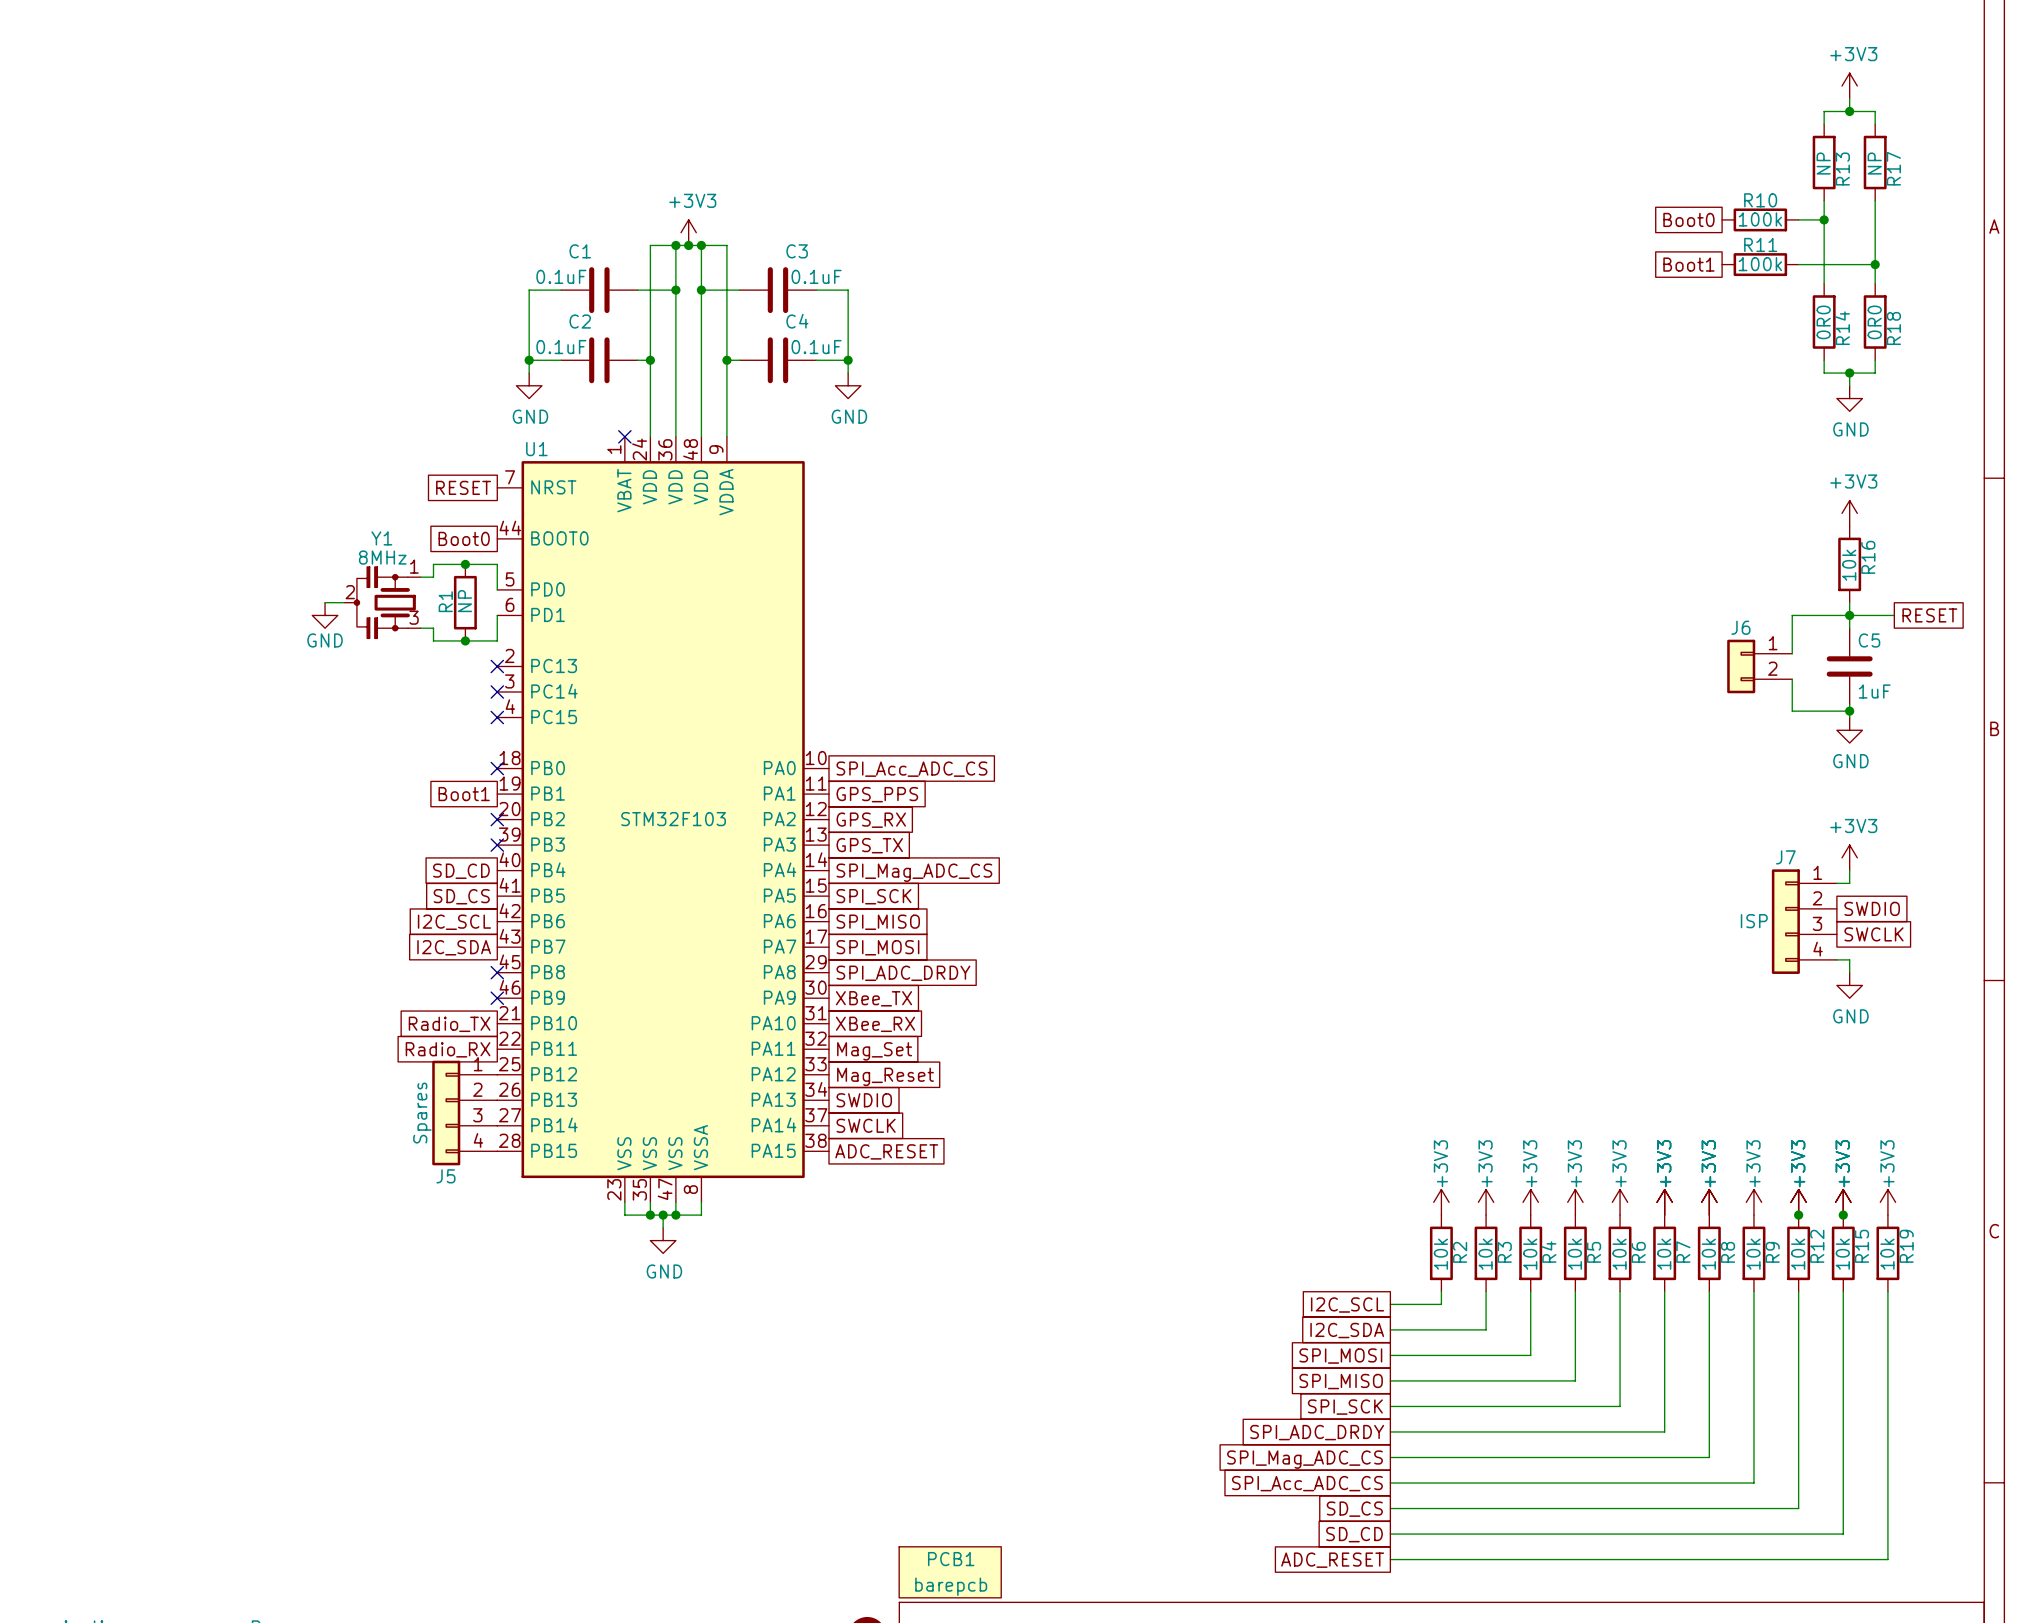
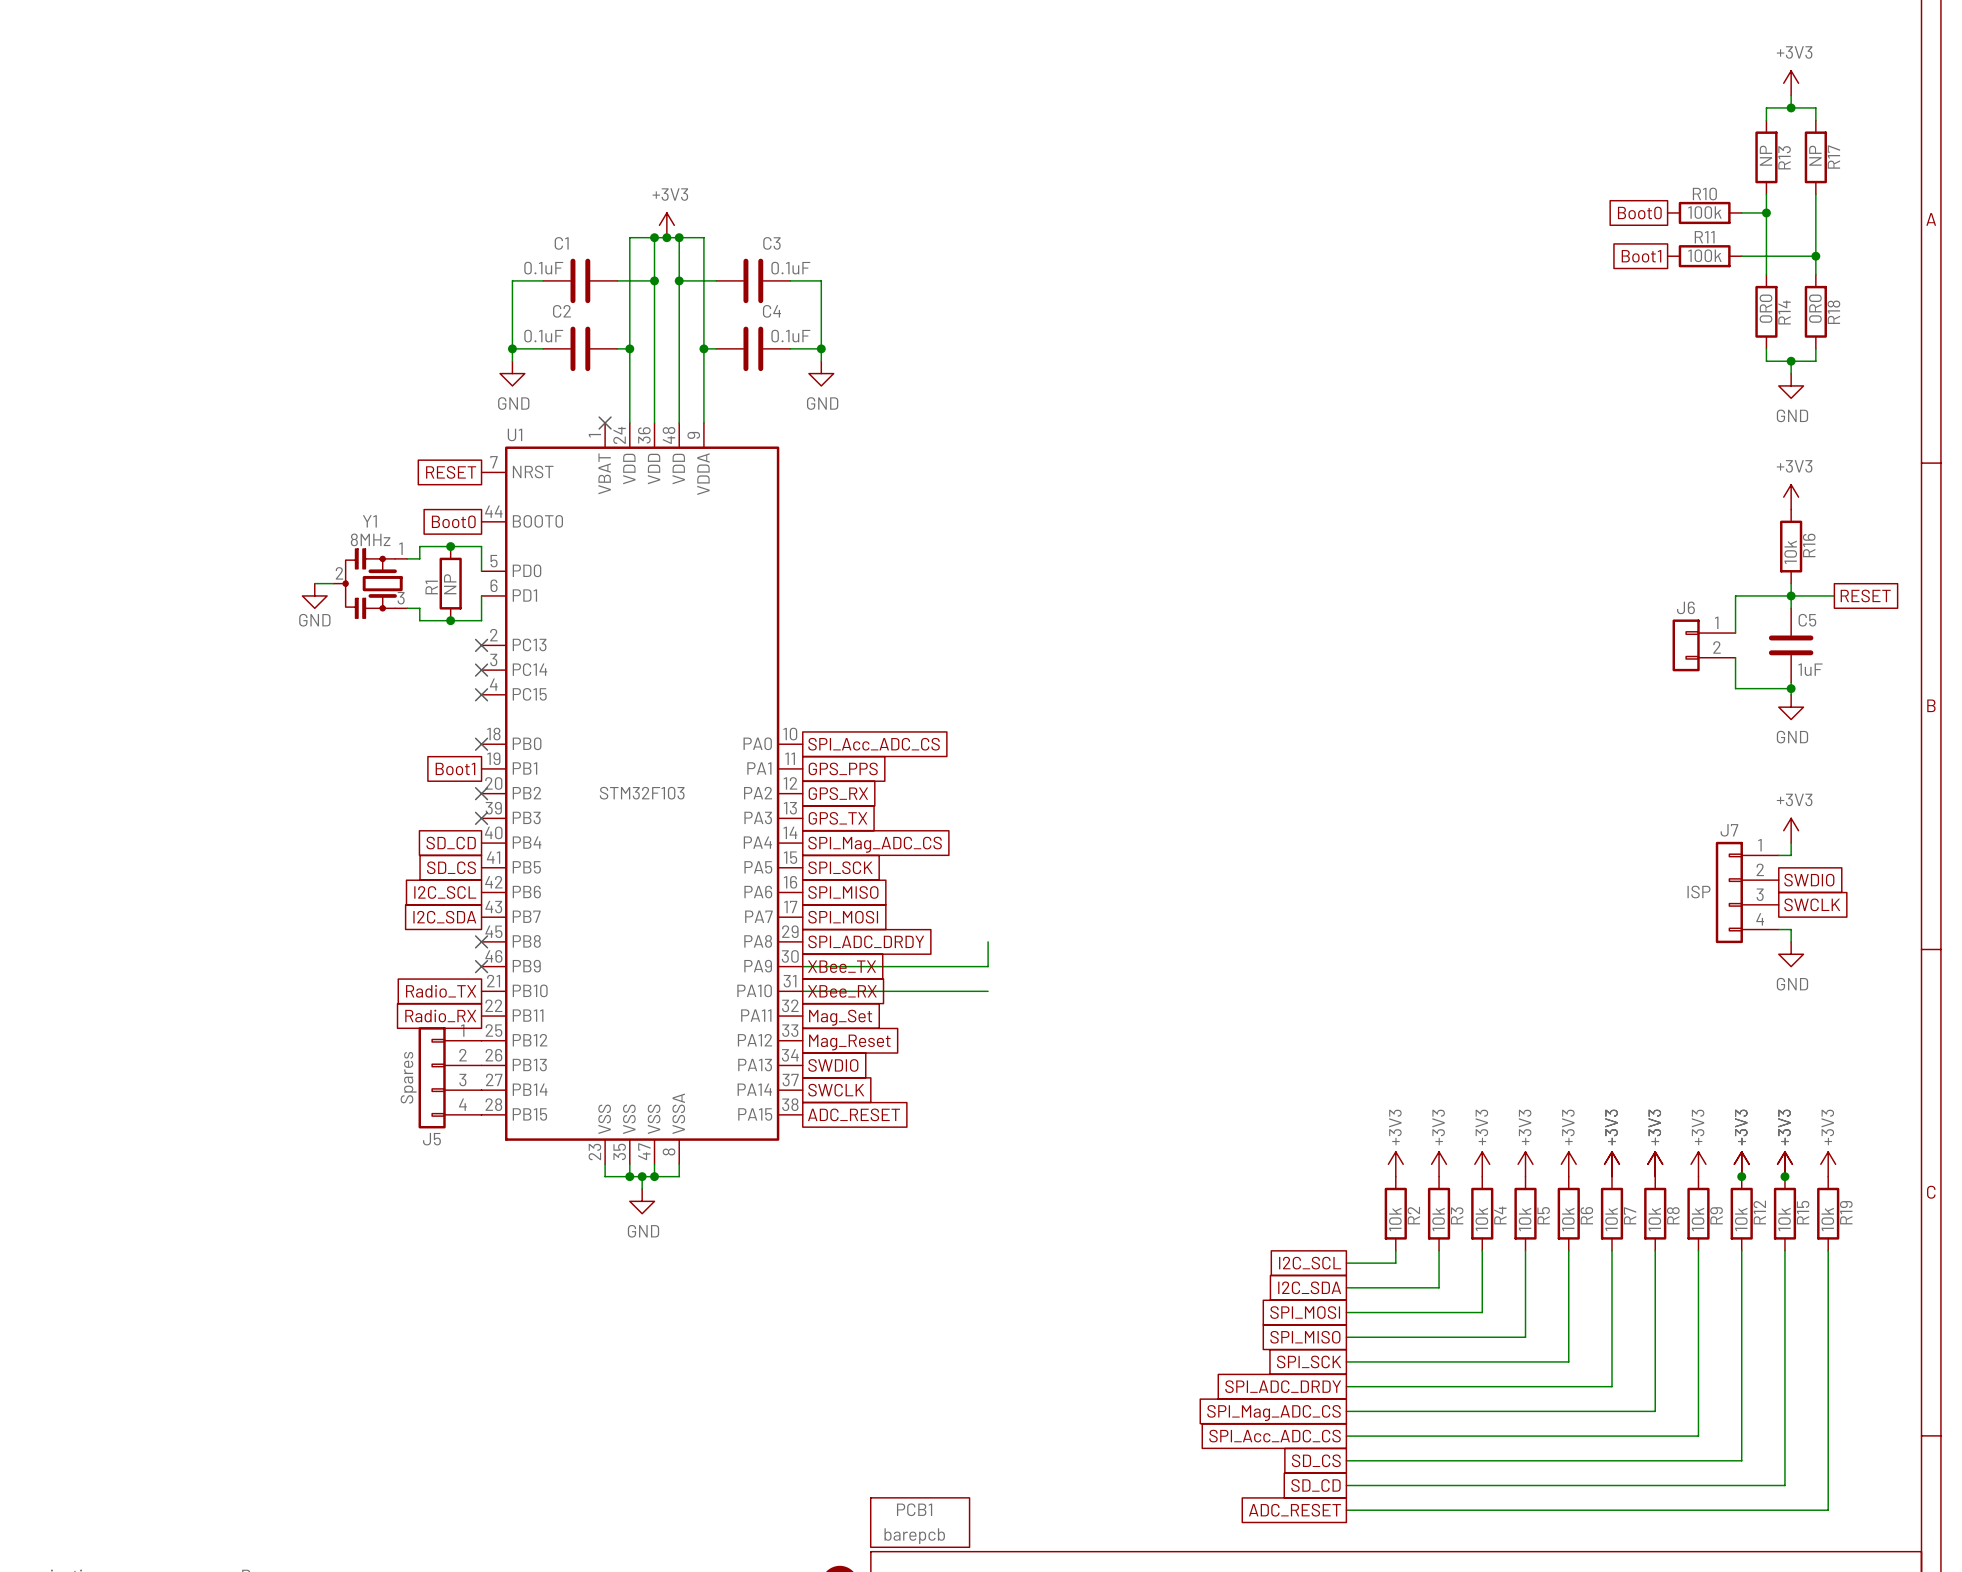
wire: none -> (988, 941) (988, 966) (802, 966)
wire: none -> (802, 991) (988, 991)

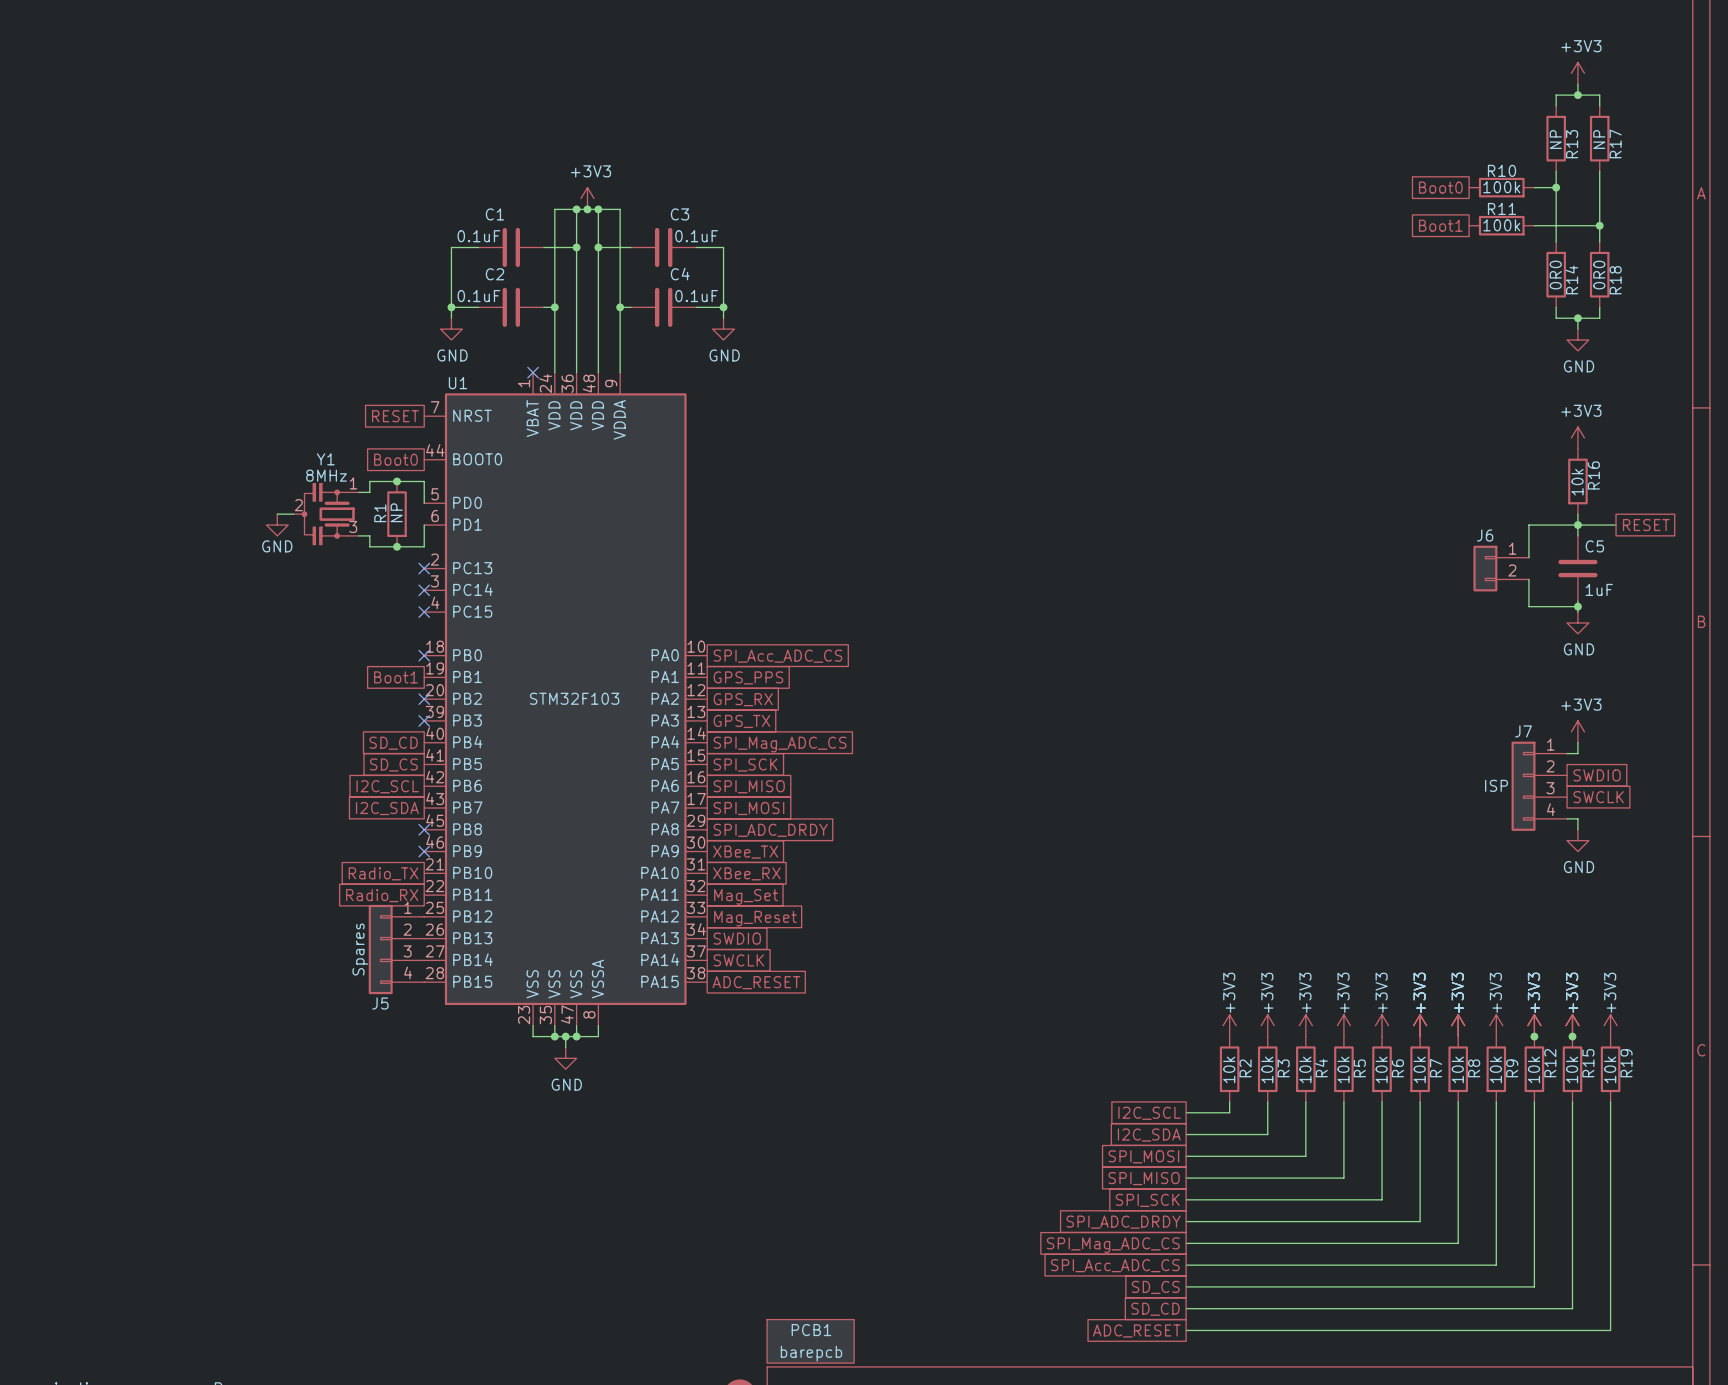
wire: (988, 941) (988, 966) (802, 966) -> none
wire: (802, 991) (988, 991) -> none

